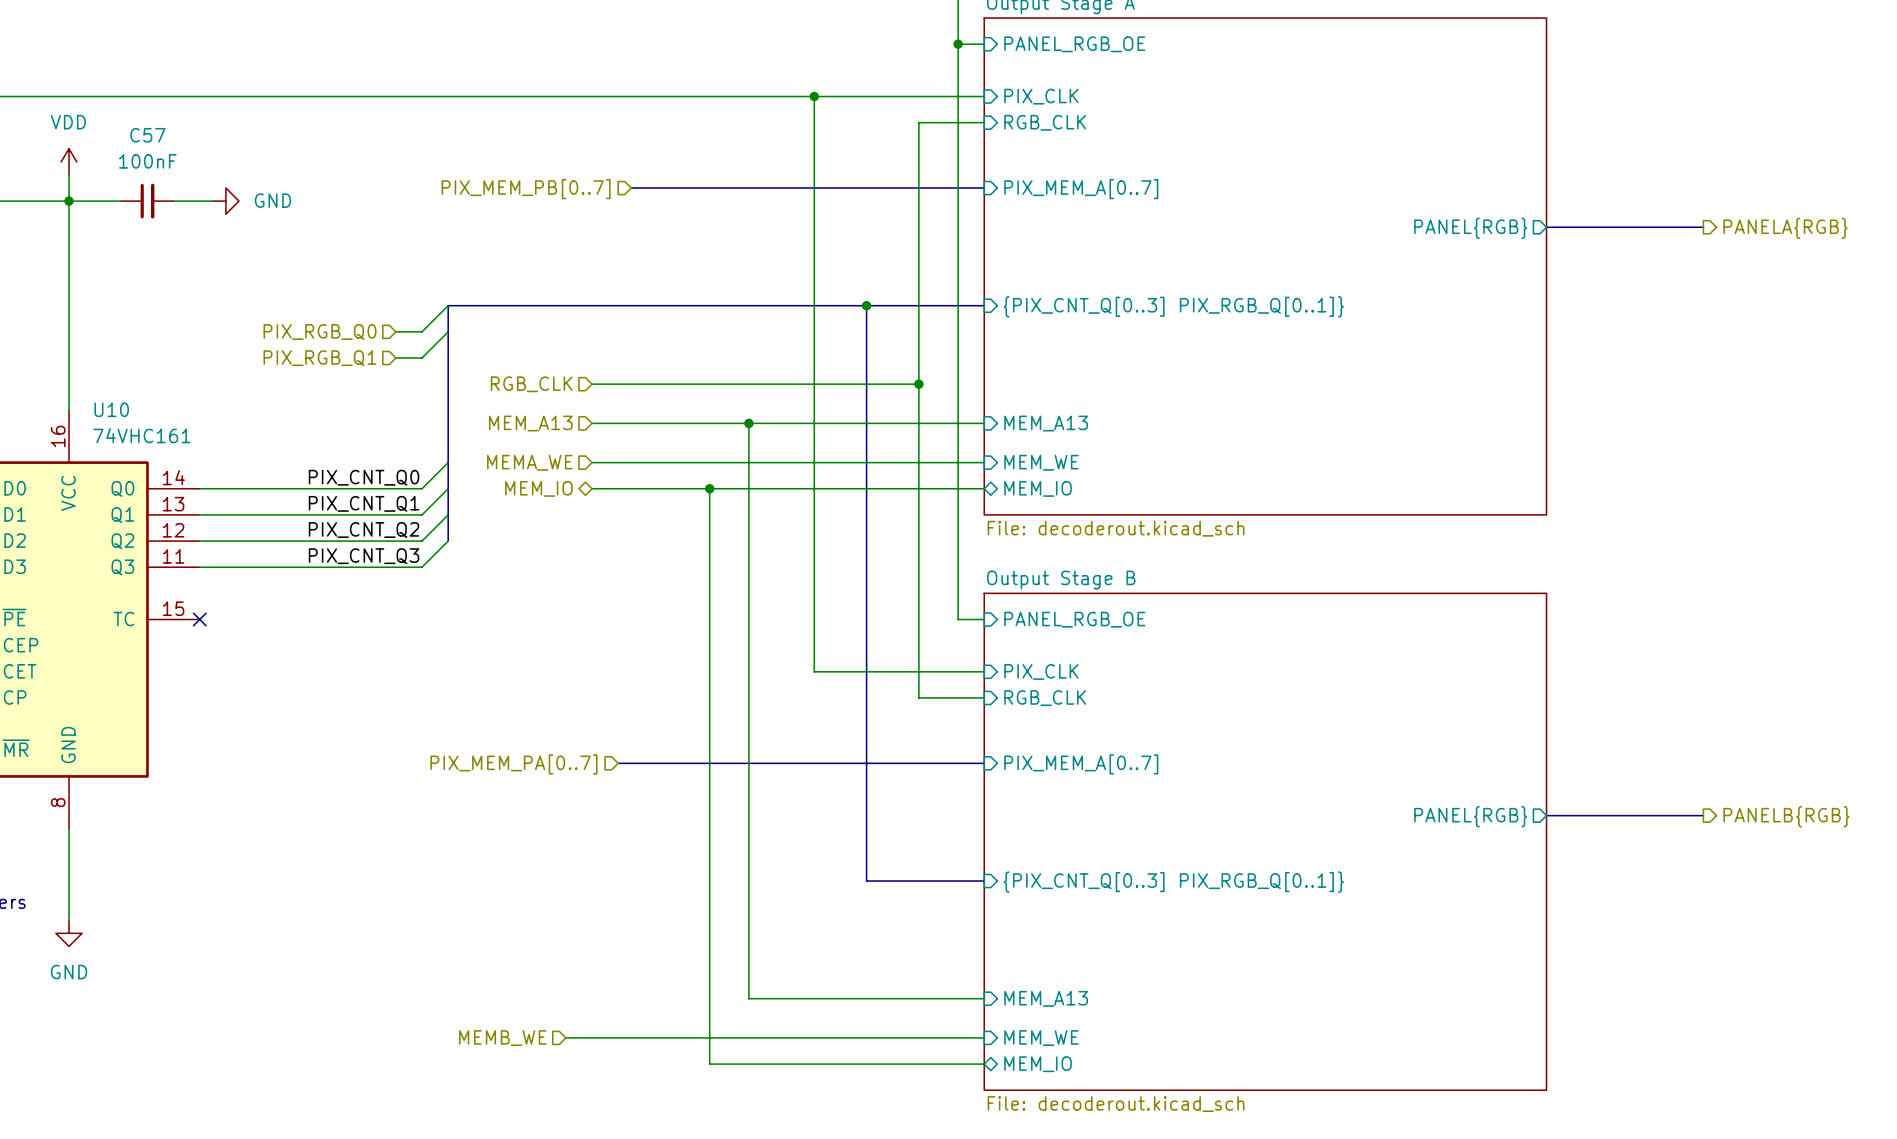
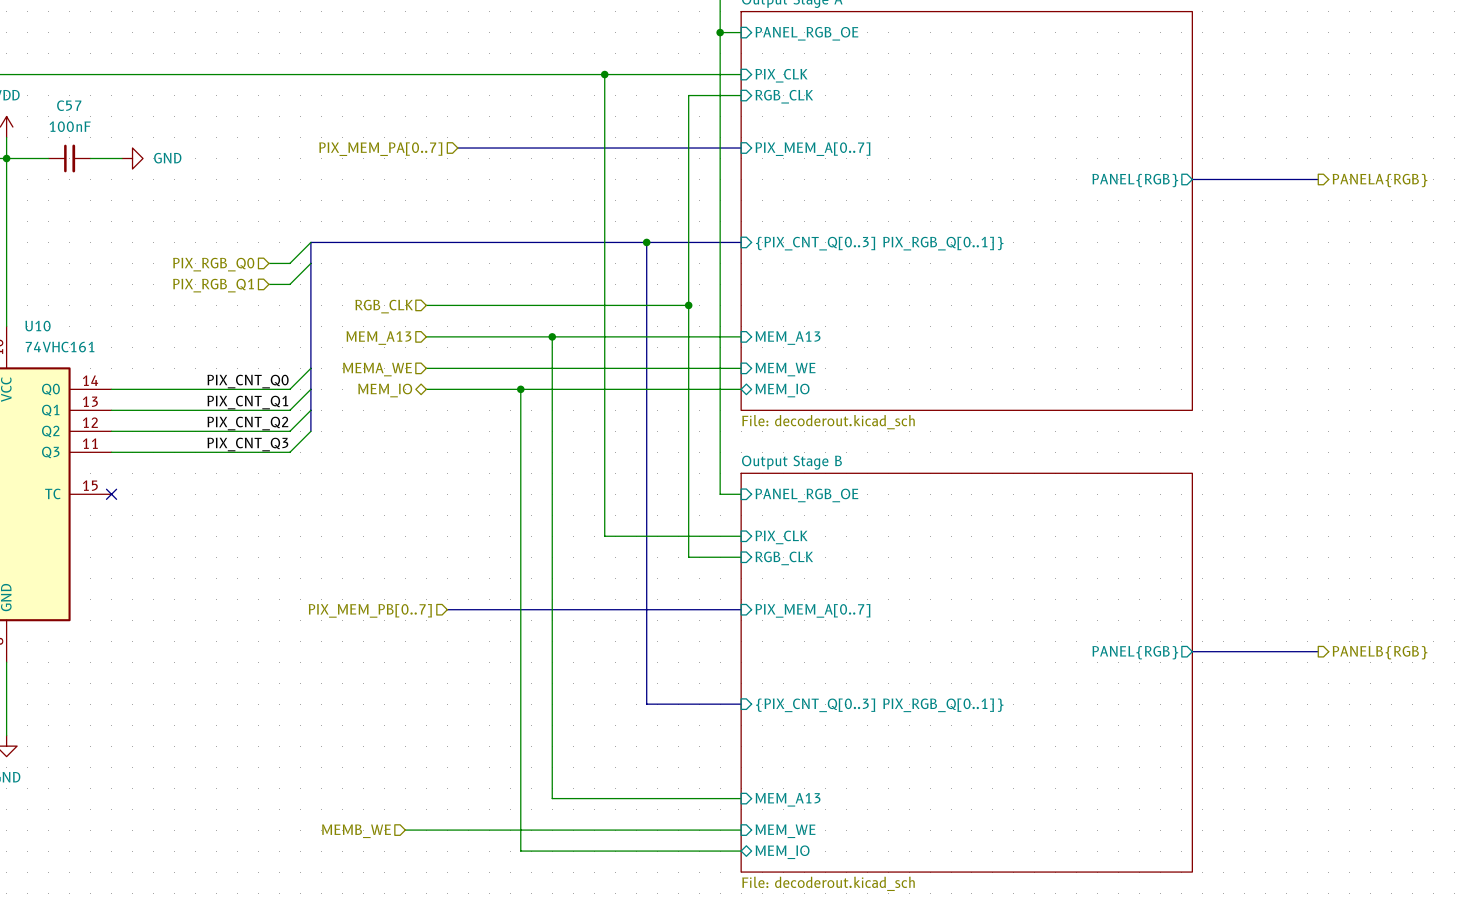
hierarchical label: PIX_MEM_PB[0..7] (526, 189) -> PIX_MEM_PA[0..7] (380, 149)
hierarchical label: PIX_MEM_PA[0..7] (513, 764) -> PIX_MEM_PB[0..7] (370, 610)

